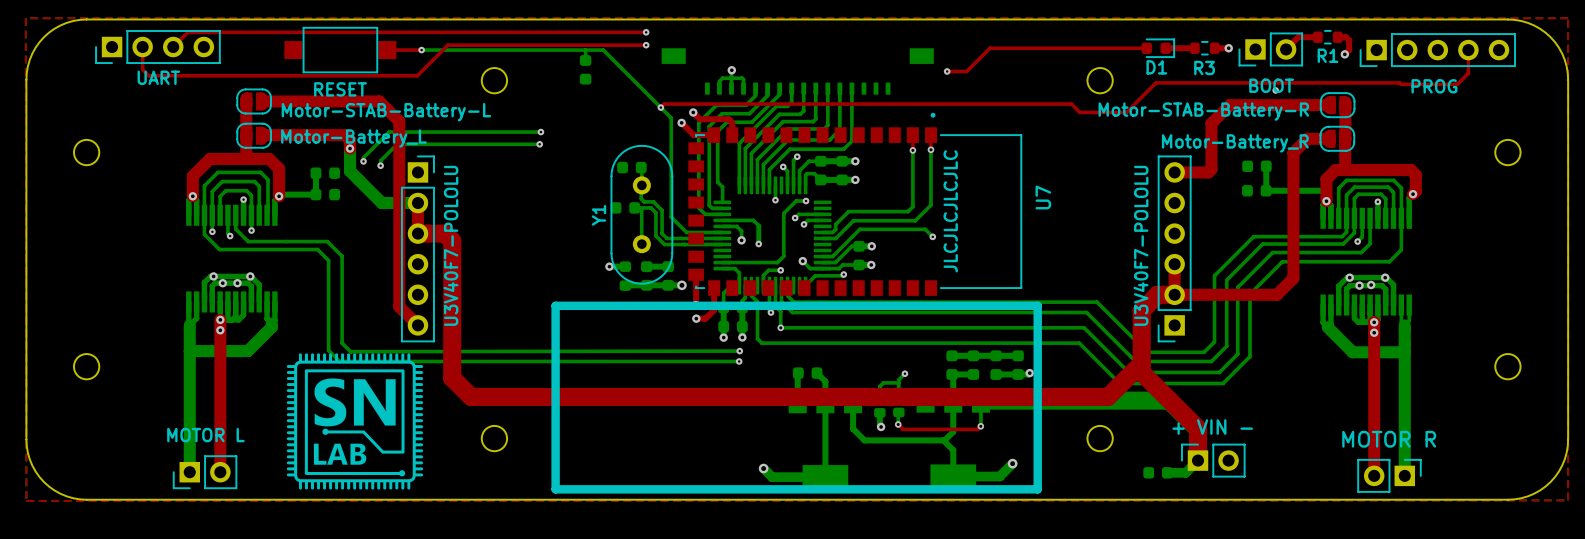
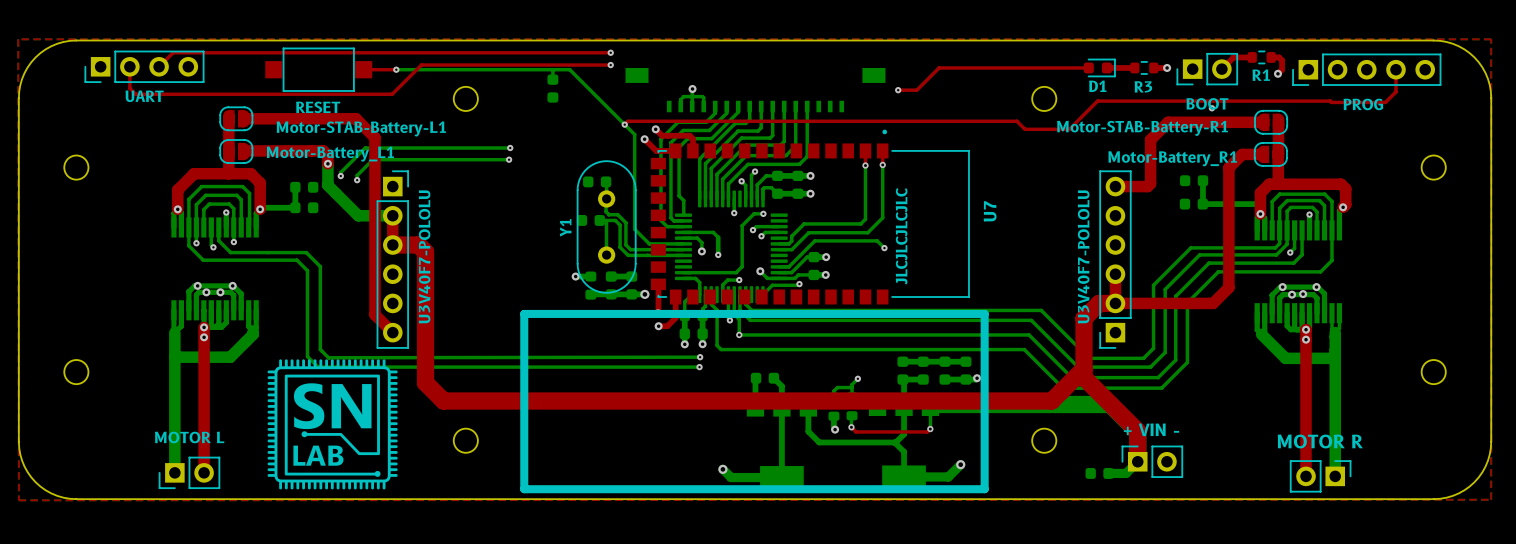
Motor-STAB-Battery-R name: Motor-STAB-Battery-R (1203, 111) -> Motor-STAB-Battery-R1 (1142, 128)
Motor-STAB-Battery-L name: Motor-STAB-Battery-L (386, 112) -> Motor-STAB-Battery-L1 (361, 128)
Motor-Battery_L name: Motor-Battery_L (353, 138) -> Motor-Battery_L1 (330, 154)
Motor-Battery_R name: Motor-Battery_R (1235, 143) -> Motor-Battery_R1 (1172, 158)

